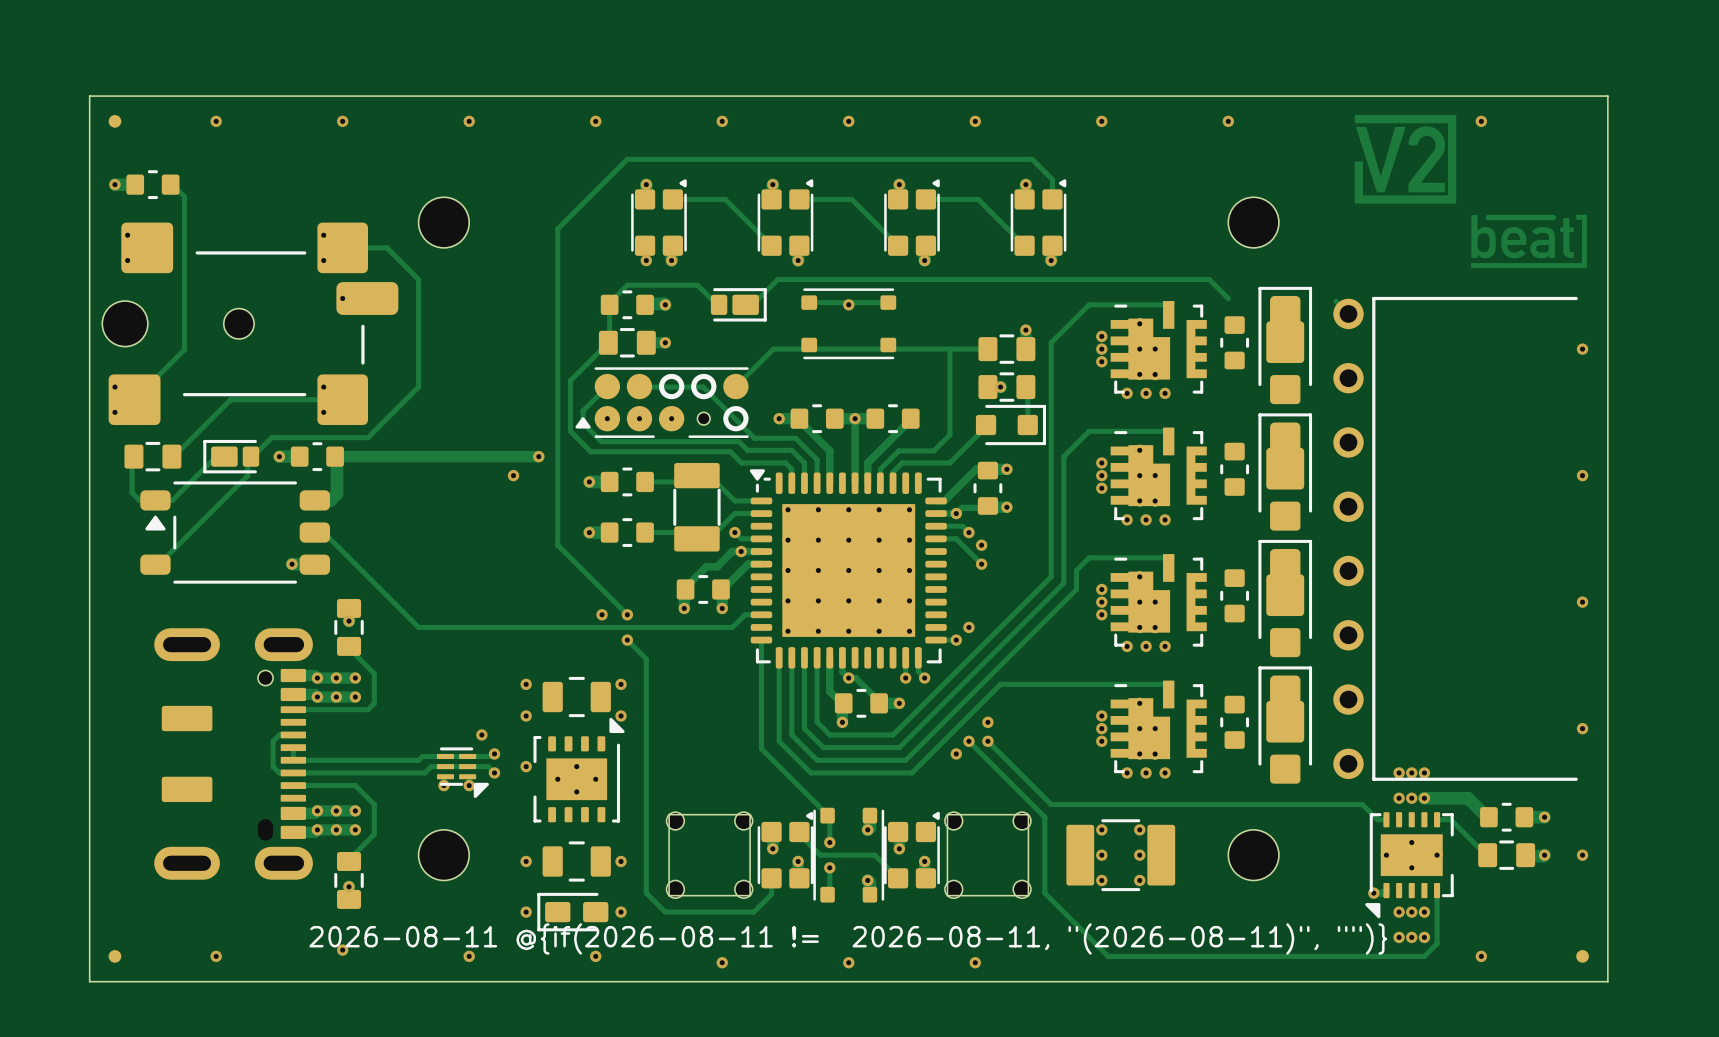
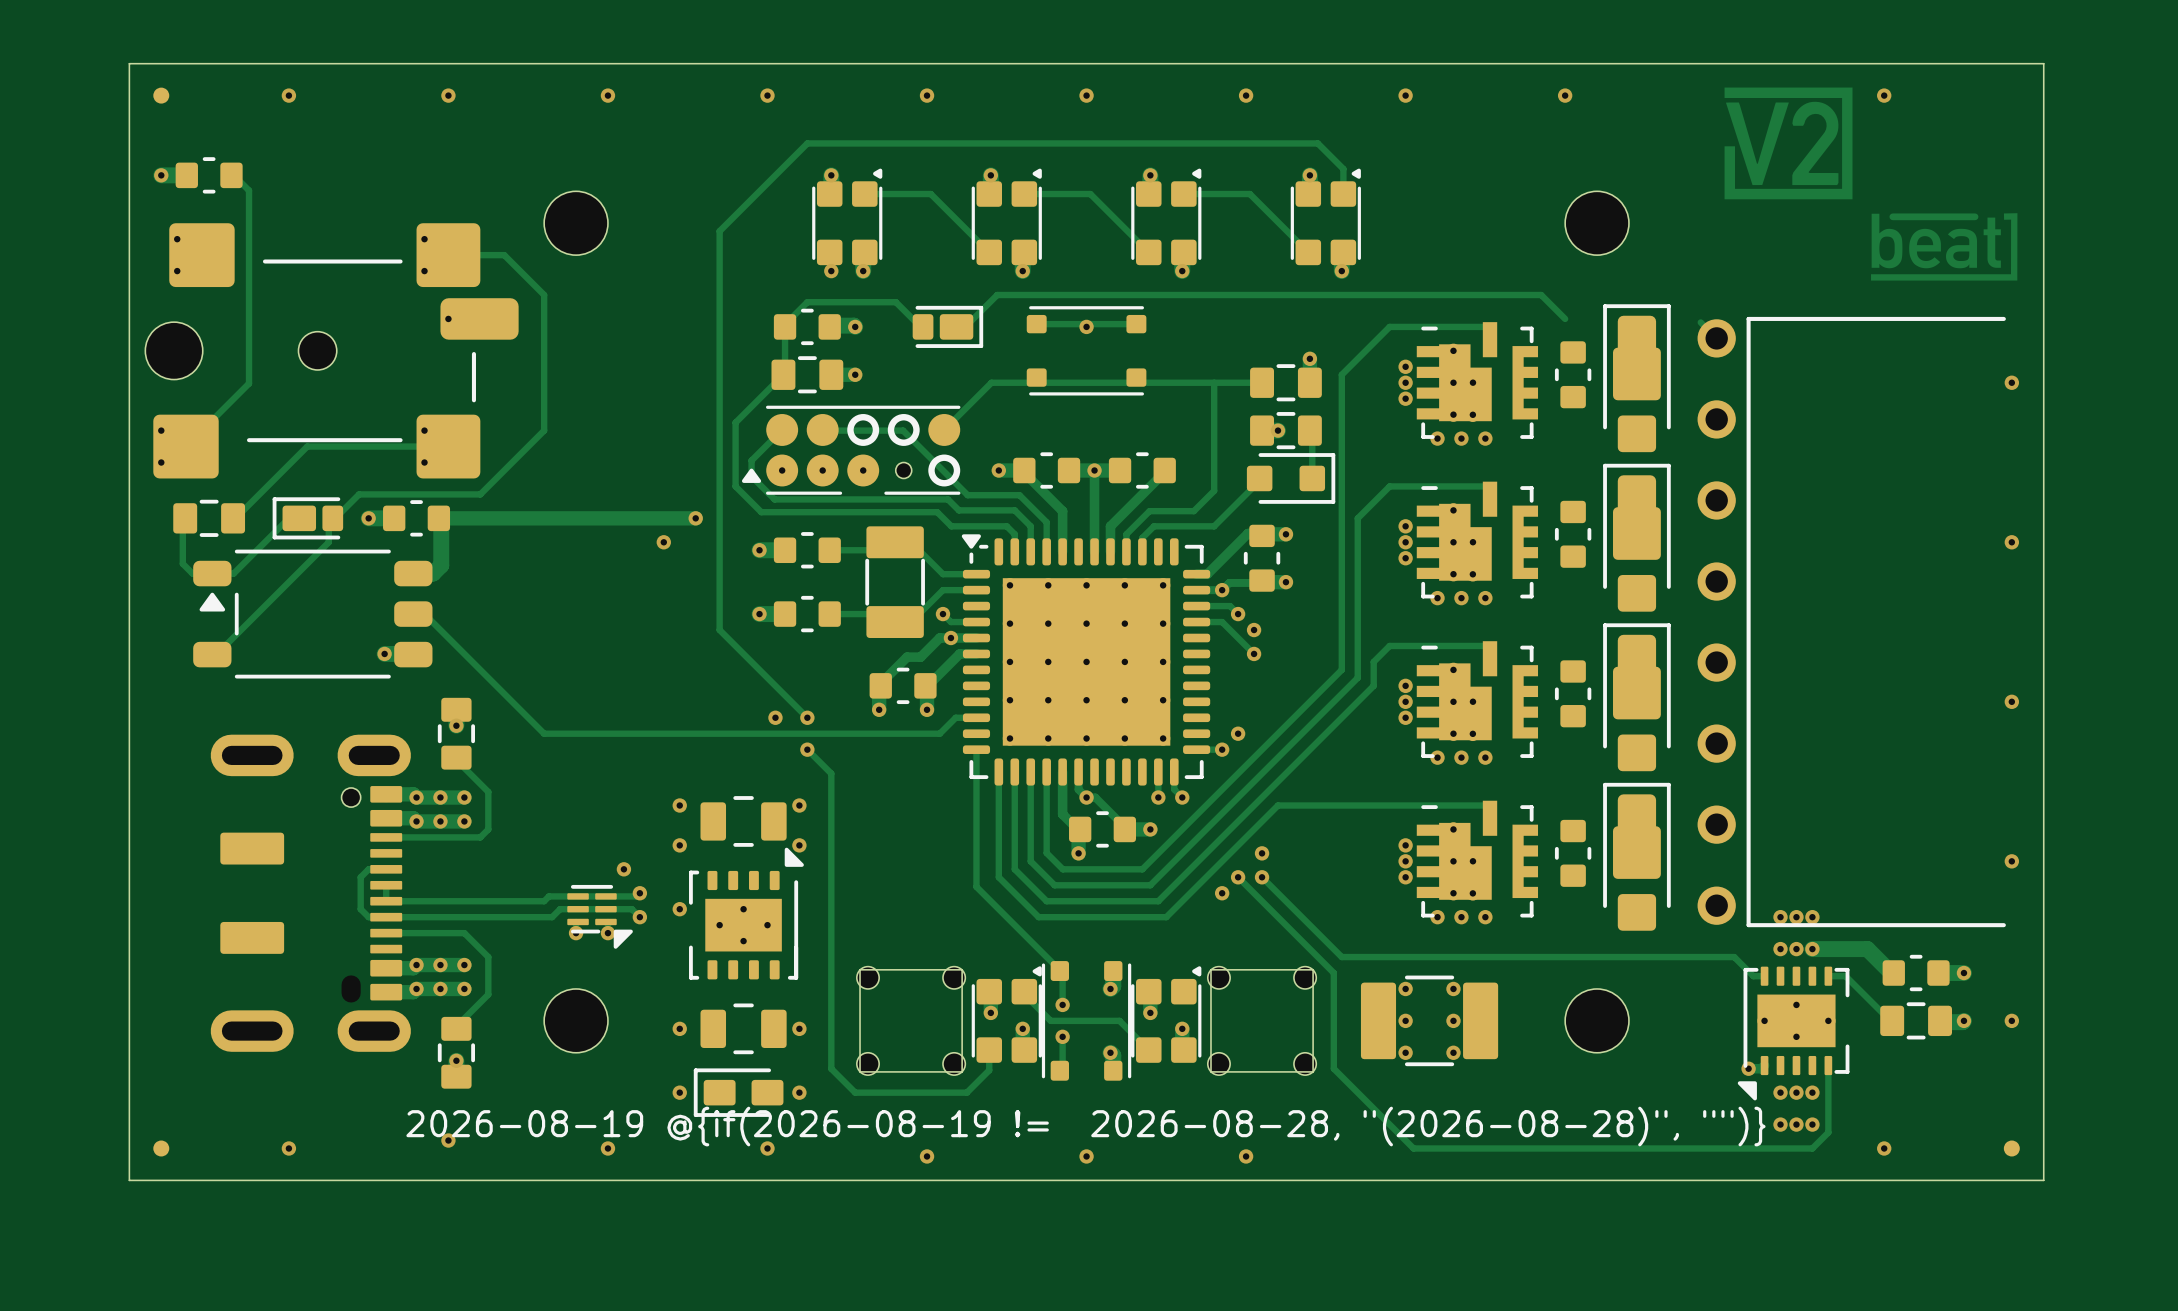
drawing shape: [309, 923, 1388, 955] -> [406, 1106, 1766, 1147]

